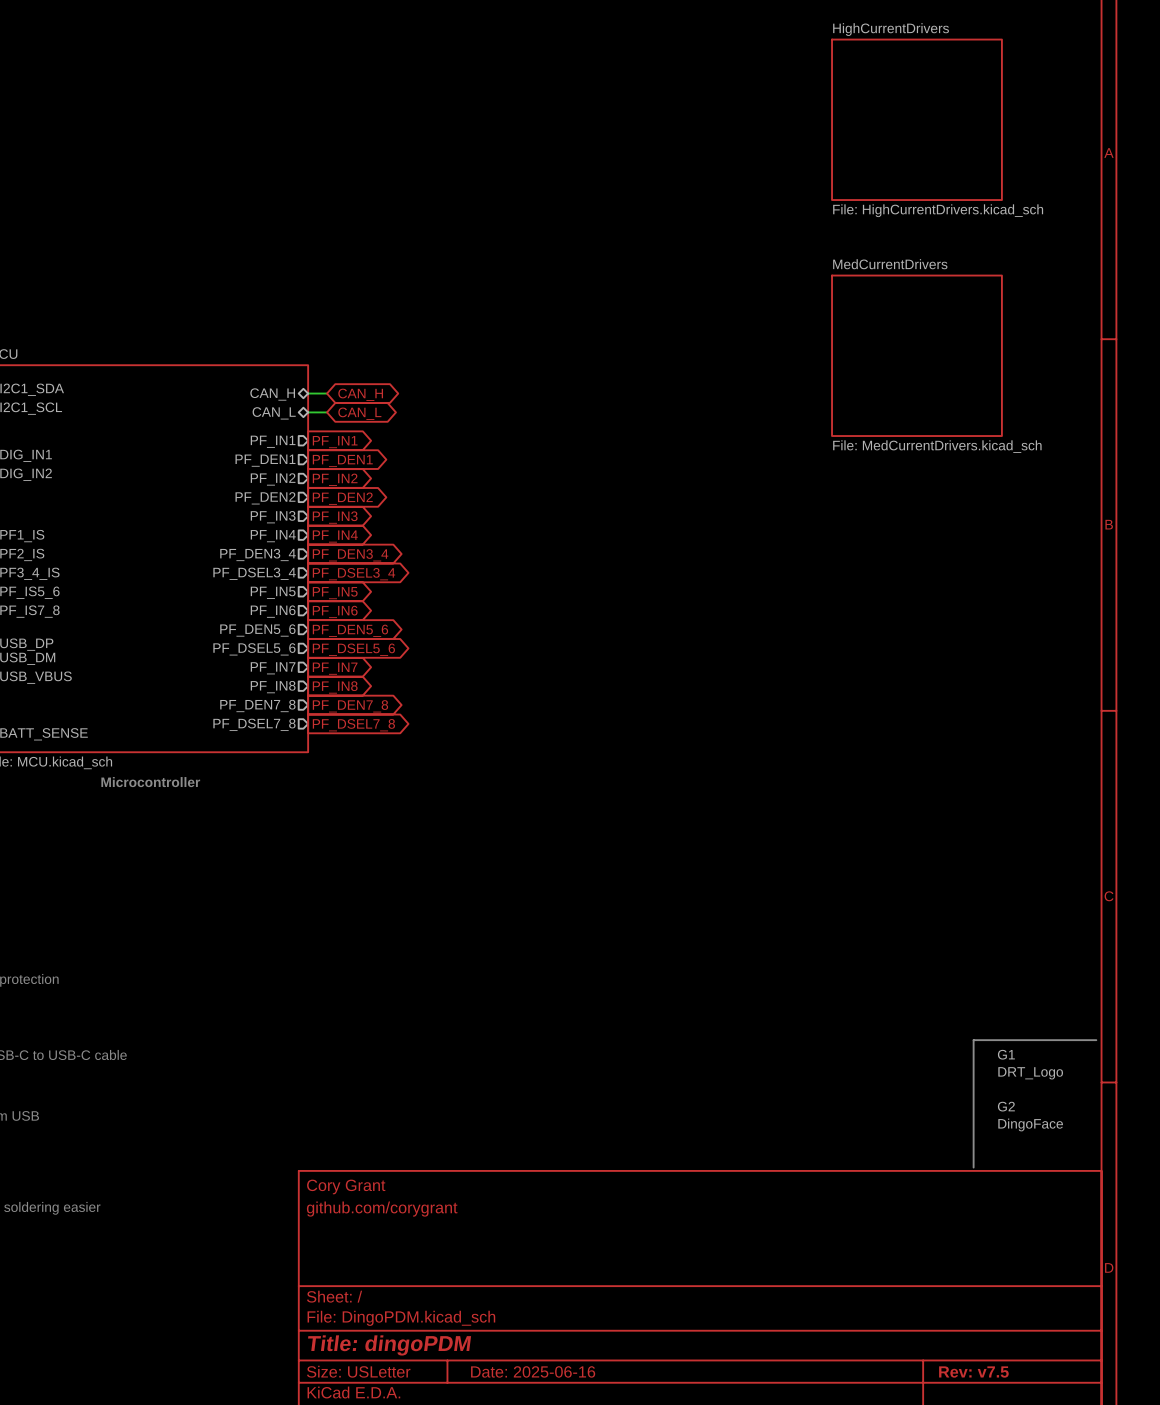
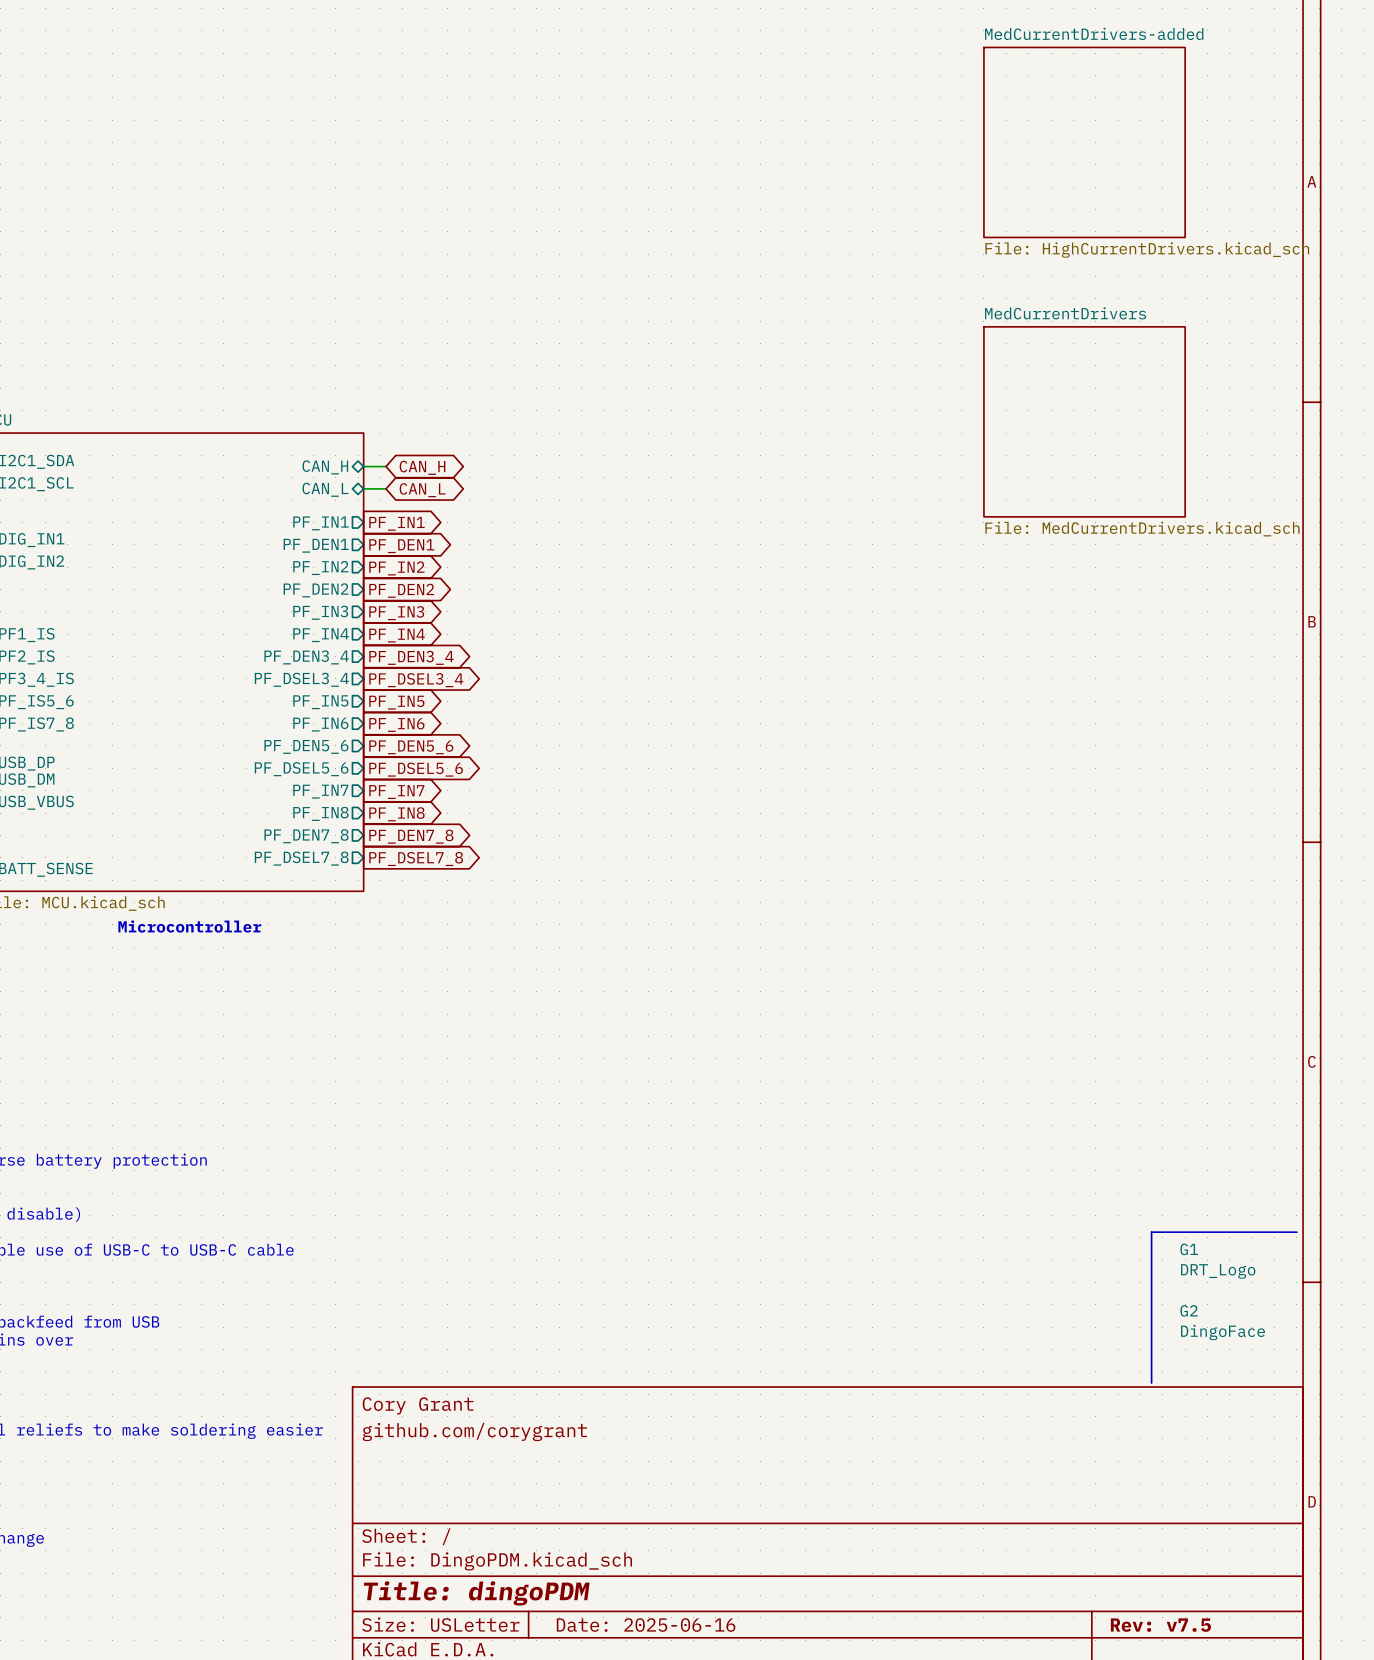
sheet HighCurrentDrivers name: HighCurrentDrivers (891, 29) -> MedCurrentDrivers-added (1094, 33)

